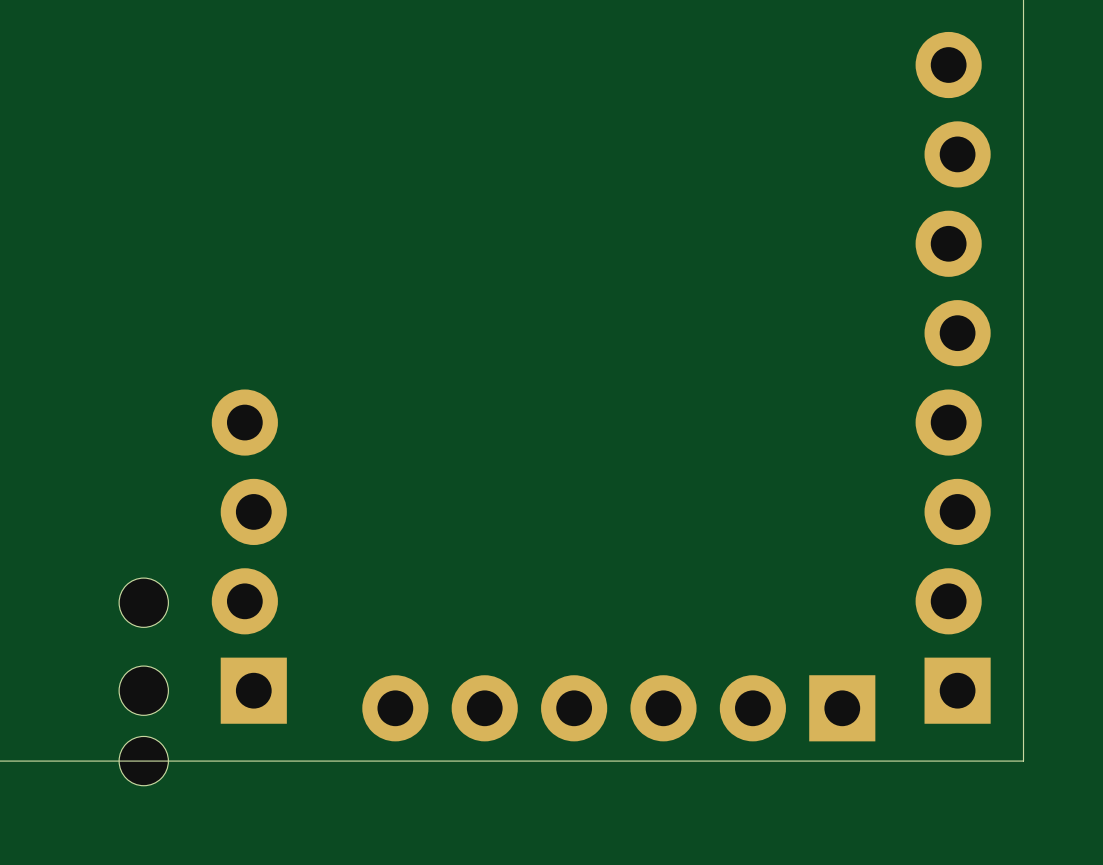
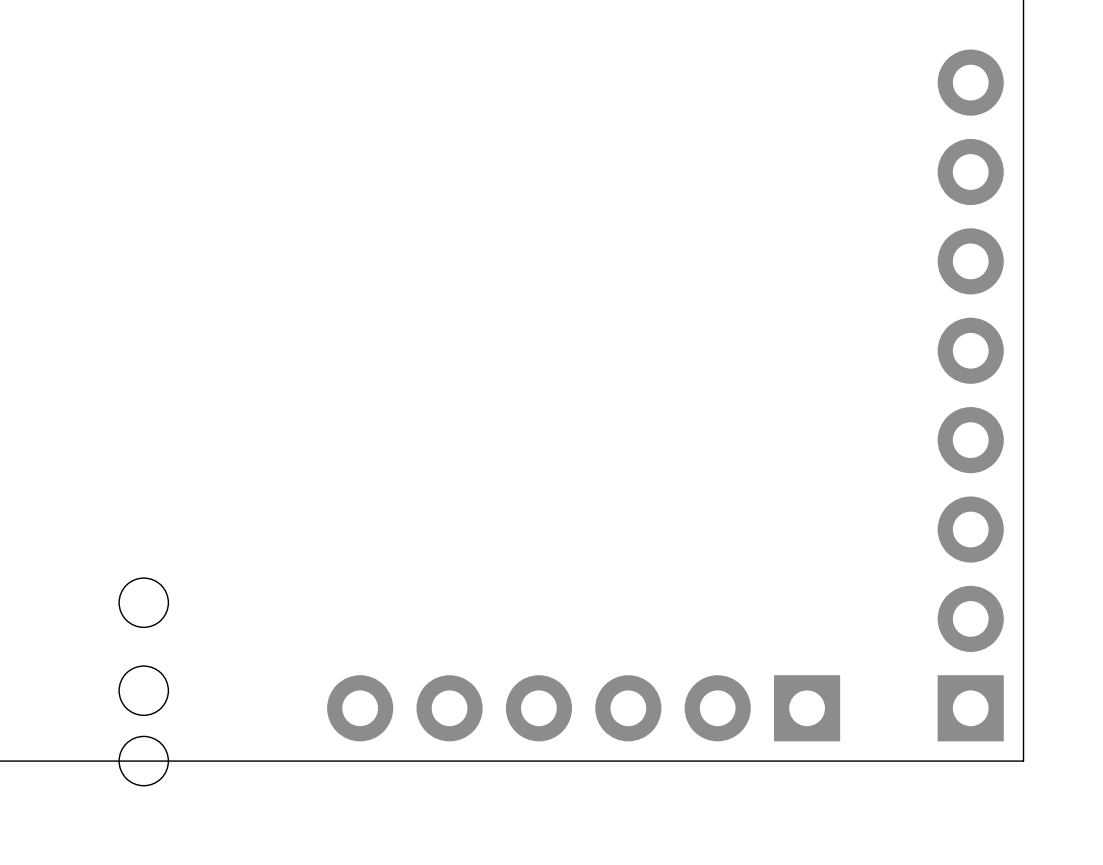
part footprint: [915, 31, 991, 724] -> [937, 49, 1004, 742]
part: (249, 556) -> none
part position: (618, 708) -> (583, 708)

